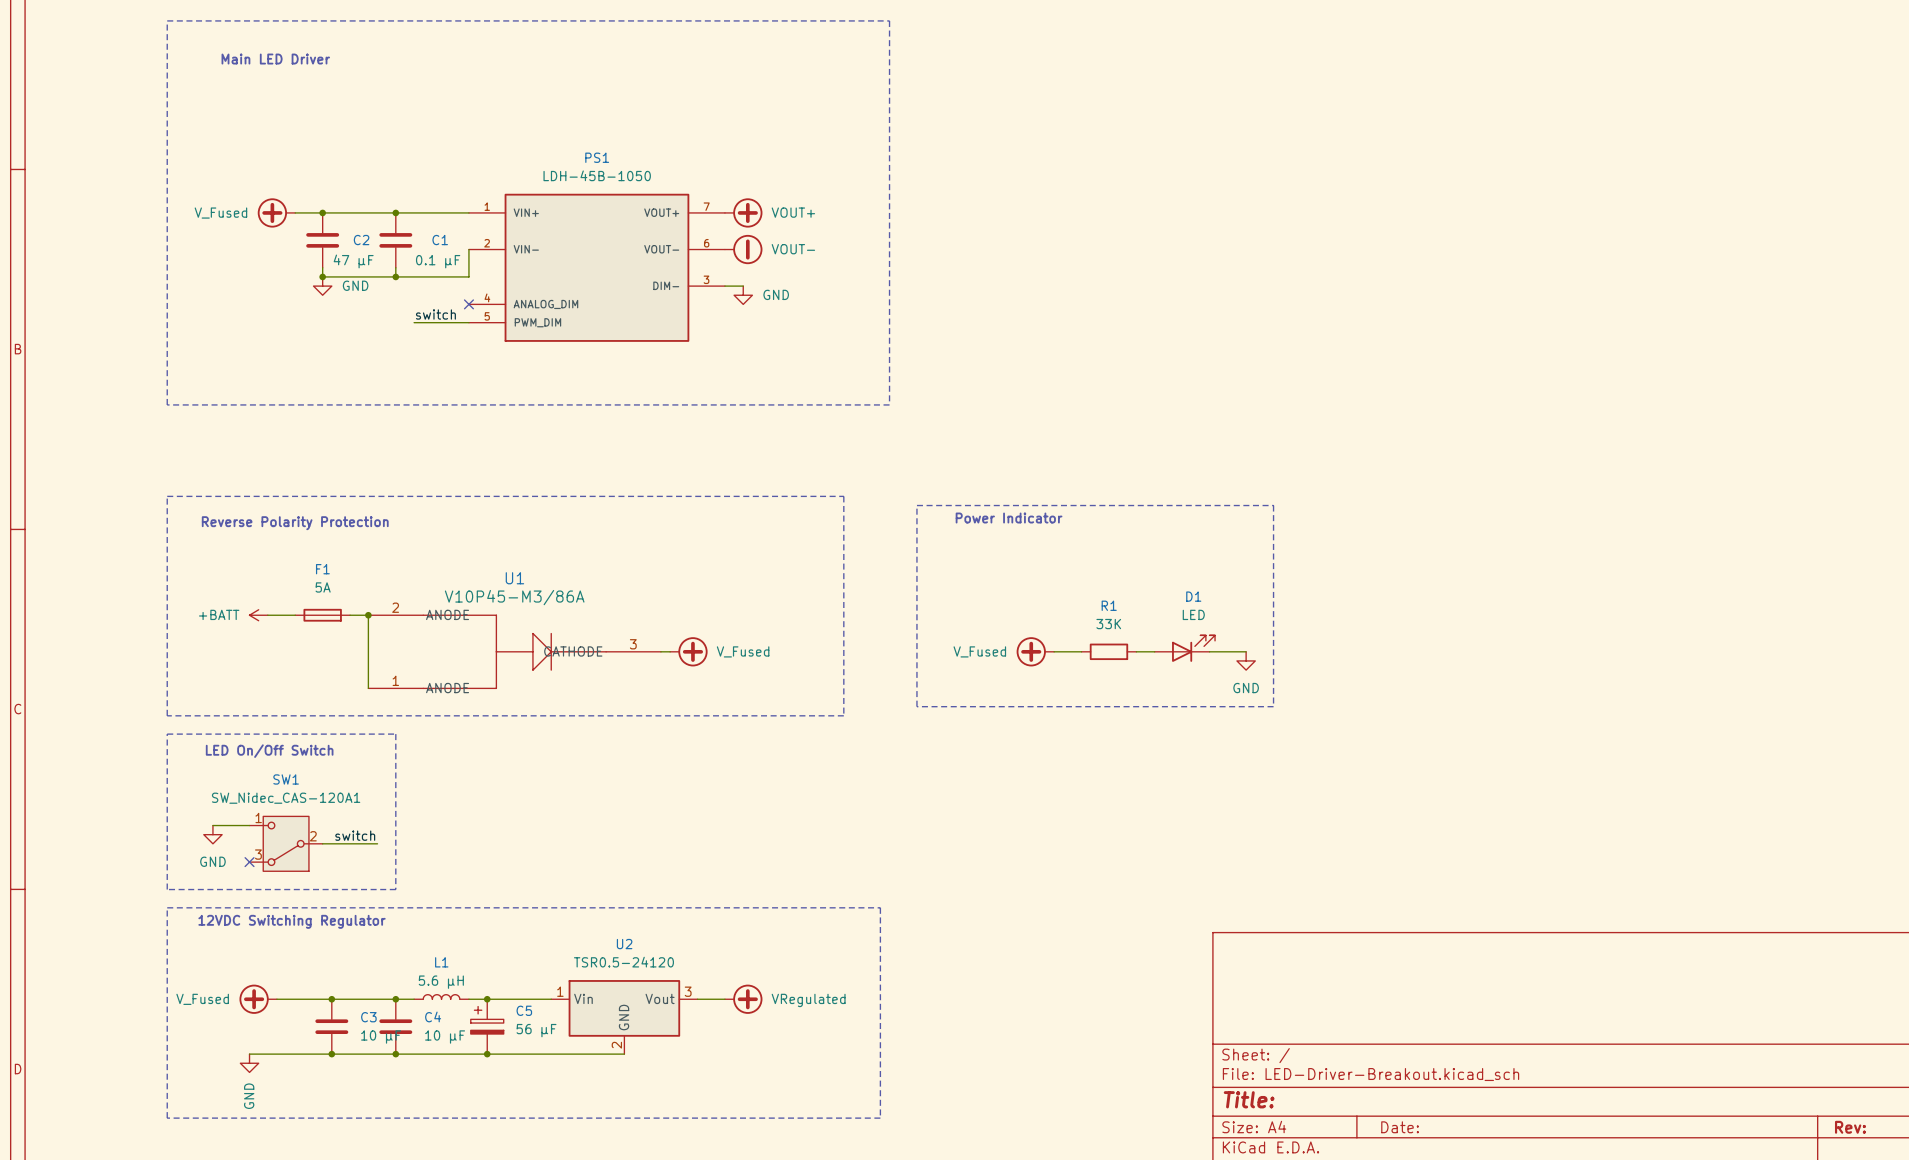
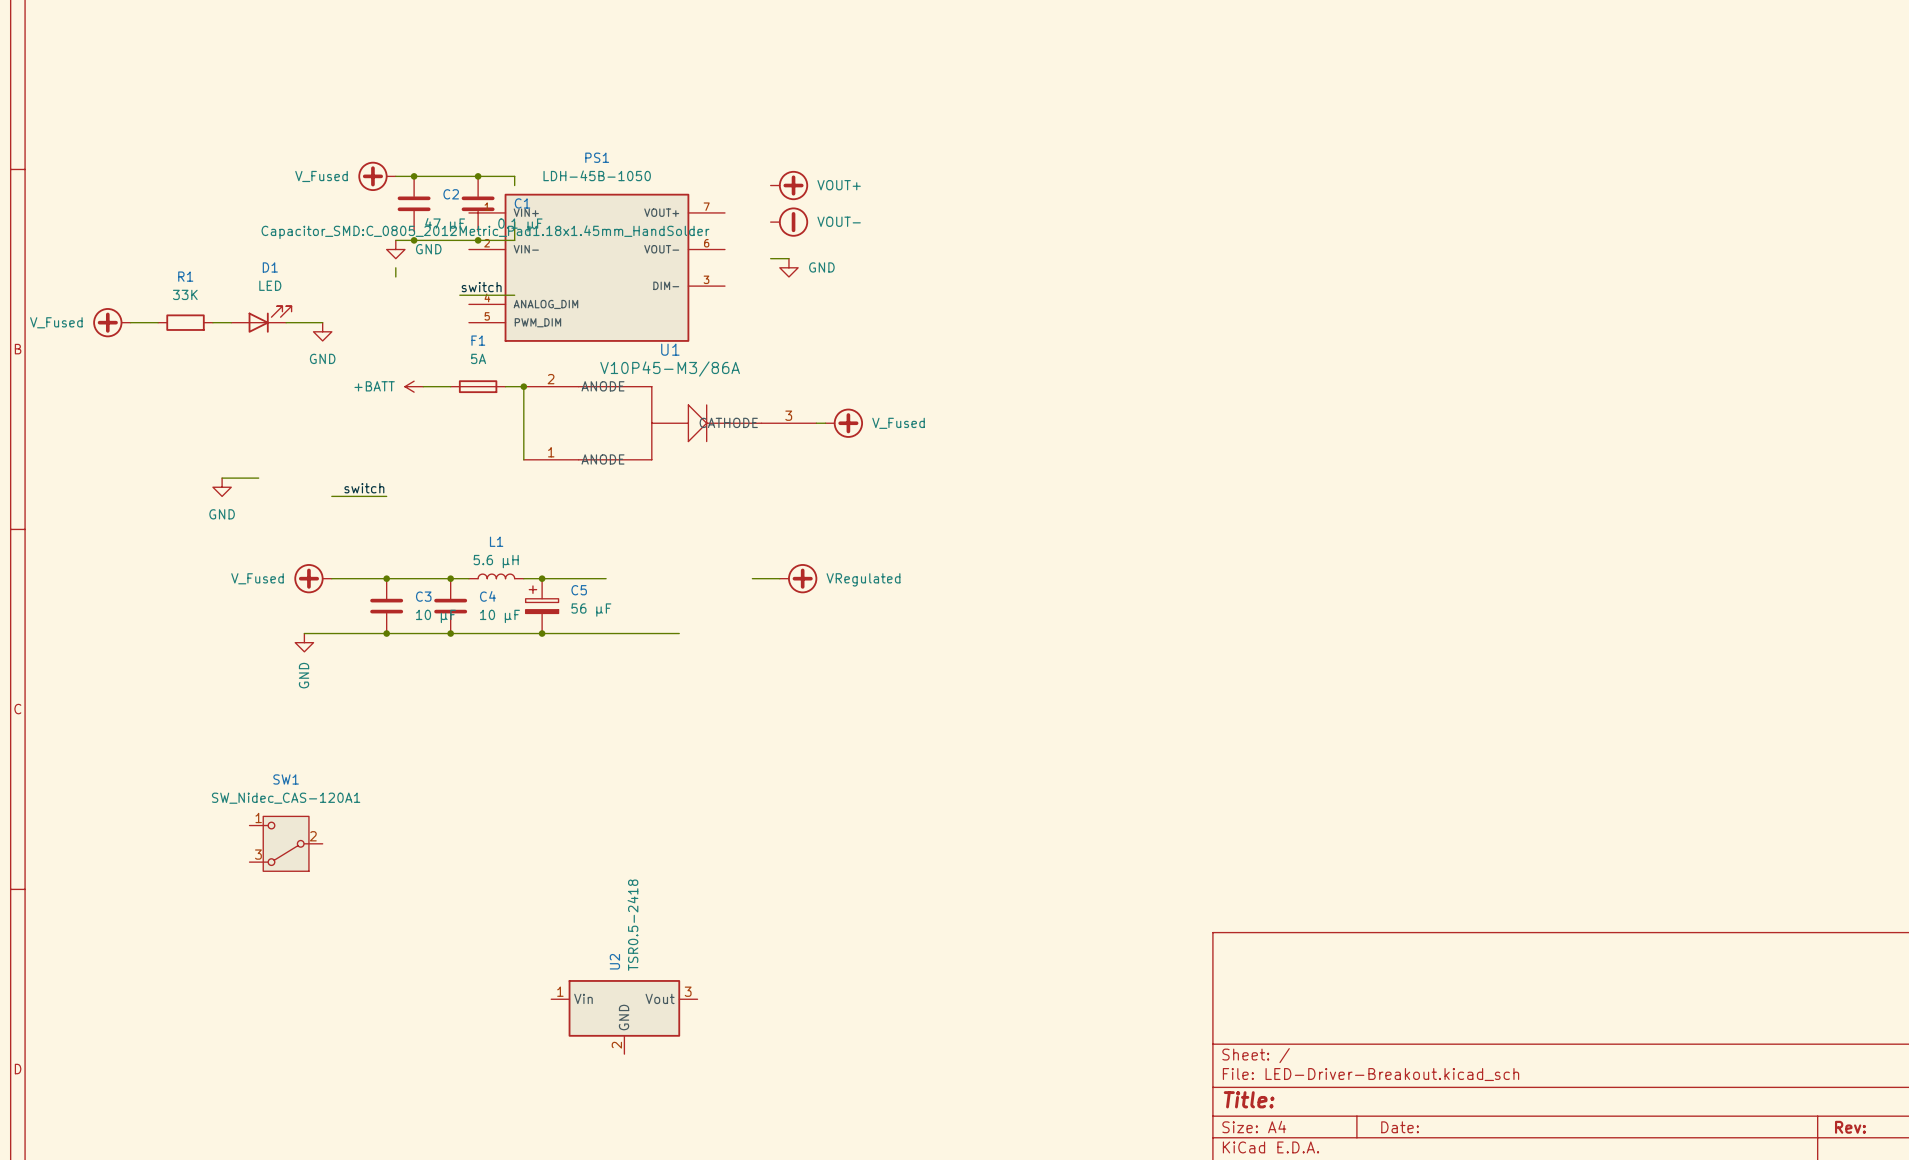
line: (167, 20) (167, 404) (889, 404) (889, 20) (167, 20) -> none
text: Main LED Driver (275, 59) -> none
power symbol: none -> V_Fused (377, 176)
wire: none -> (395, 176) (514, 176) (514, 185)
junction: none -> (414, 176)
junction: none -> (478, 176)
power symbol: V_Fused (276, 212) -> none
wire: (295, 212) (468, 212) -> none
junction: (322, 212) -> none
junction: (395, 212) -> none
power symbol position: VOUT+ (743, 212) -> VOUT+ (789, 185)
wire: none -> (514, 222) (514, 240) (395, 240)
C1 text: none -> Capacitor_SMD:C_0805_2012Metric_Pad1.18x1.45mm_HandSolder (485, 232)
C2 position: (322, 240) -> (414, 203)
C2 name position: C2 (361, 240) -> C2 (451, 194)
C1 position: (395, 240) -> (478, 203)
junction: none -> (414, 240)
junction: none -> (478, 240)
power symbol: none -> GND (395, 249)
wire: (468, 249) (468, 276) (322, 276) (322, 267) -> none
power symbol position: VOUT- (743, 249) -> VOUT- (789, 222)
junction: (322, 276) -> none
junction: (395, 276) -> none
power symbol: GND (322, 286) -> none
wire: (724, 286) (743, 286) -> (770, 258) (788, 258)
power symbol position: GND (743, 295) -> GND (788, 267)
no-connect mark: (468, 304) -> none
label position: switch (435, 314) -> switch (481, 287)
power symbol: none -> V_Fused (111, 322)
wire: none -> (130, 322) (158, 322)
wire: none -> (212, 322) (231, 322)
wire: none -> (286, 322) (322, 322)
wire: (414, 322) (468, 322) -> (459, 295) (514, 295)
power symbol: none -> GND (322, 331)
power symbol: none -> +BATT (414, 386)
wire: none -> (423, 386) (450, 386)
wire: none -> (505, 386) (523, 386) (523, 459)
junction: none -> (523, 386)
wire: none -> (816, 423) (825, 423)
power symbol: none -> V_Fused (844, 423)
wire: none -> (222, 478) (258, 478)
power symbol: none -> GND (222, 487)
label: none -> switch (364, 488)
line: (167, 496) (167, 715) (843, 715) (843, 496) (167, 496) -> none
line: (916, 505) (1273, 505) (1273, 706) (916, 706) (916, 505) -> none
text: Power Indicator (1009, 518) -> none
text: Reverse Polarity Protection (295, 523) -> none
power symbol: none -> V_Fused (313, 578)
wire: none -> (331, 578) (468, 578)
junction: none -> (386, 578)
junction: none -> (450, 578)
wire: none -> (523, 578) (606, 578)
junction: none -> (542, 578)
wire: none -> (752, 578) (779, 578)
power symbol: none -> VRegulated (798, 578)
power symbol: +BATT (258, 615) -> none
wire: (267, 615) (295, 615) -> none
F1 position: (322, 615) -> (478, 386)
wire: (350, 615) (368, 615) (368, 688) -> none
junction: (368, 615) -> none
wire: none -> (304, 633) (679, 633)
junction: none -> (386, 633)
junction: none -> (450, 633)
junction: none -> (542, 633)
power symbol: none -> GND (304, 642)
D1 position: (1184, 648) -> (261, 319)
U1 position: (514, 651) -> (670, 423)
wire: (660, 651) (670, 651) -> none
power symbol: V_Fused (688, 651) -> none
power symbol: V_Fused (1035, 651) -> none
wire: (1054, 651) (1081, 651) -> none
R1 position: (1108, 651) -> (185, 322)
wire: (1136, 651) (1154, 651) -> none
wire: (1209, 651) (1246, 651) -> none
power symbol: GND (1246, 660) -> none
line: (167, 734) (167, 889) (395, 889) (395, 734) (167, 734) -> none
text: LED On/Off Switch (269, 751) -> none
wire: (212, 825) (249, 825) -> none
power symbol: GND (212, 834) -> none
label: switch (355, 835) -> none
wire: (322, 843) (377, 843) -> none
no-connect mark: (249, 862) -> none
line: (167, 907) (880, 907) (880, 1118) (167, 1118) (167, 907) -> none
text: 12VDC Switching Regulator (292, 921) -> none
U2 name rotation: 0° (624, 944) -> 90° counterclockwise (614, 961)
U2 value: TSR0.5-24120 (623, 962) -> TSR0.5-2418 (632, 925)
L1 position: (441, 996) -> (496, 576)
power symbol: V_Fused (258, 999) -> none
wire: (276, 999) (414, 999) -> none
junction: (331, 999) -> none
junction: (395, 999) -> none
wire: (468, 999) (551, 999) -> none
junction: (487, 999) -> none
wire: (697, 999) (724, 999) -> none
power symbol: VRegulated (743, 999) -> none
C3 position: (331, 1026) -> (386, 606)
C4 position: (395, 1026) -> (450, 606)
C5 position: (487, 1026) -> (542, 606)
wire: (249, 1054) (624, 1054) -> none
junction: (331, 1054) -> none
junction: (395, 1054) -> none
junction: (487, 1054) -> none
power symbol: GND (249, 1063) -> none

